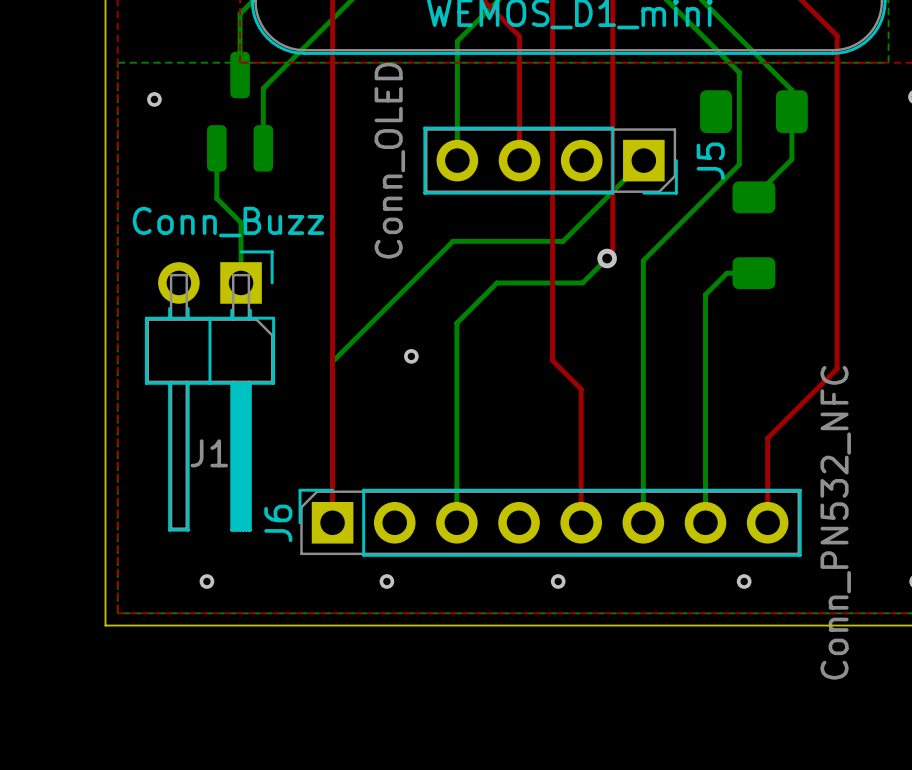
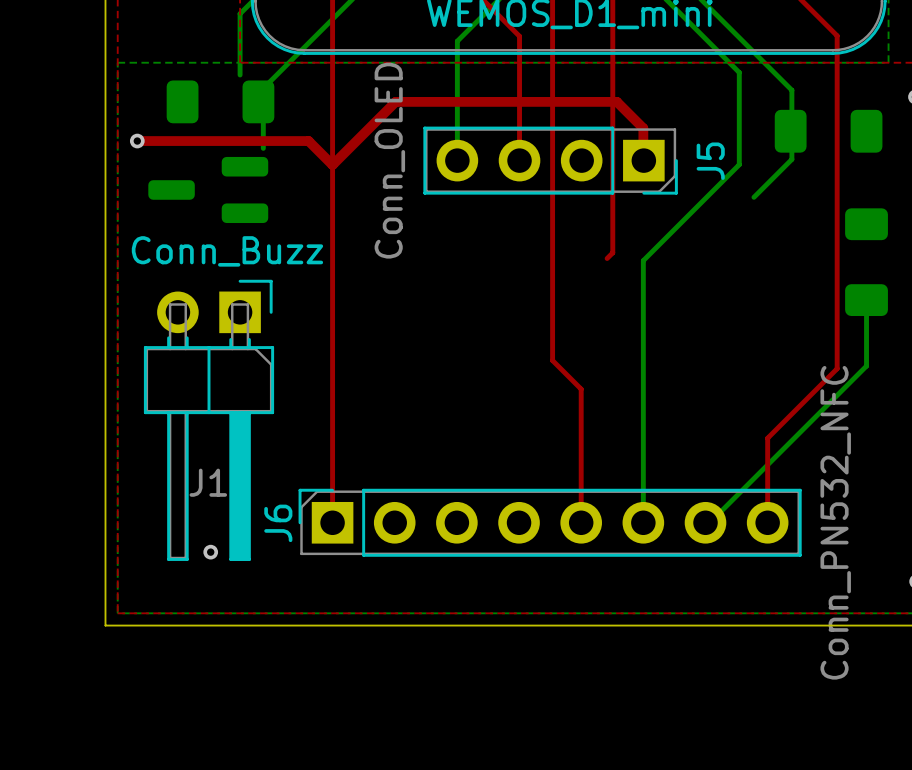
part footprint: [207, 51, 274, 172] -> [166, 80, 275, 124]
via position: (154, 99) -> (137, 141)
part: (753, 111) -> none
part: none -> (828, 131)
top track: none -> (137, 141) (308, 141) (332, 165) (395, 101) (616, 101) (643, 128) (643, 160)
bottom track: (216, 148) (216, 198) (241, 222) (241, 282) -> none
bottom track: (643, 160) (563, 241) (452, 241) (332, 361) (332, 522) -> none
part: none -> (208, 189)
part: (753, 235) -> none
bottom track: (607, 258) (582, 282) (497, 282) (456, 323) (456, 522) -> none
via: (607, 258) -> none
part: none -> (866, 262)
bottom track: (753, 273) (727, 273) (705, 294) (705, 522) -> none
bottom track: none -> (866, 300) (866, 366) (705, 527)
via: (411, 356) -> none
J1 position: (209, 391) -> (209, 420)
via position: (206, 581) -> (210, 552)
via: (386, 581) -> none
via: (558, 581) -> none
via: (744, 581) -> none

